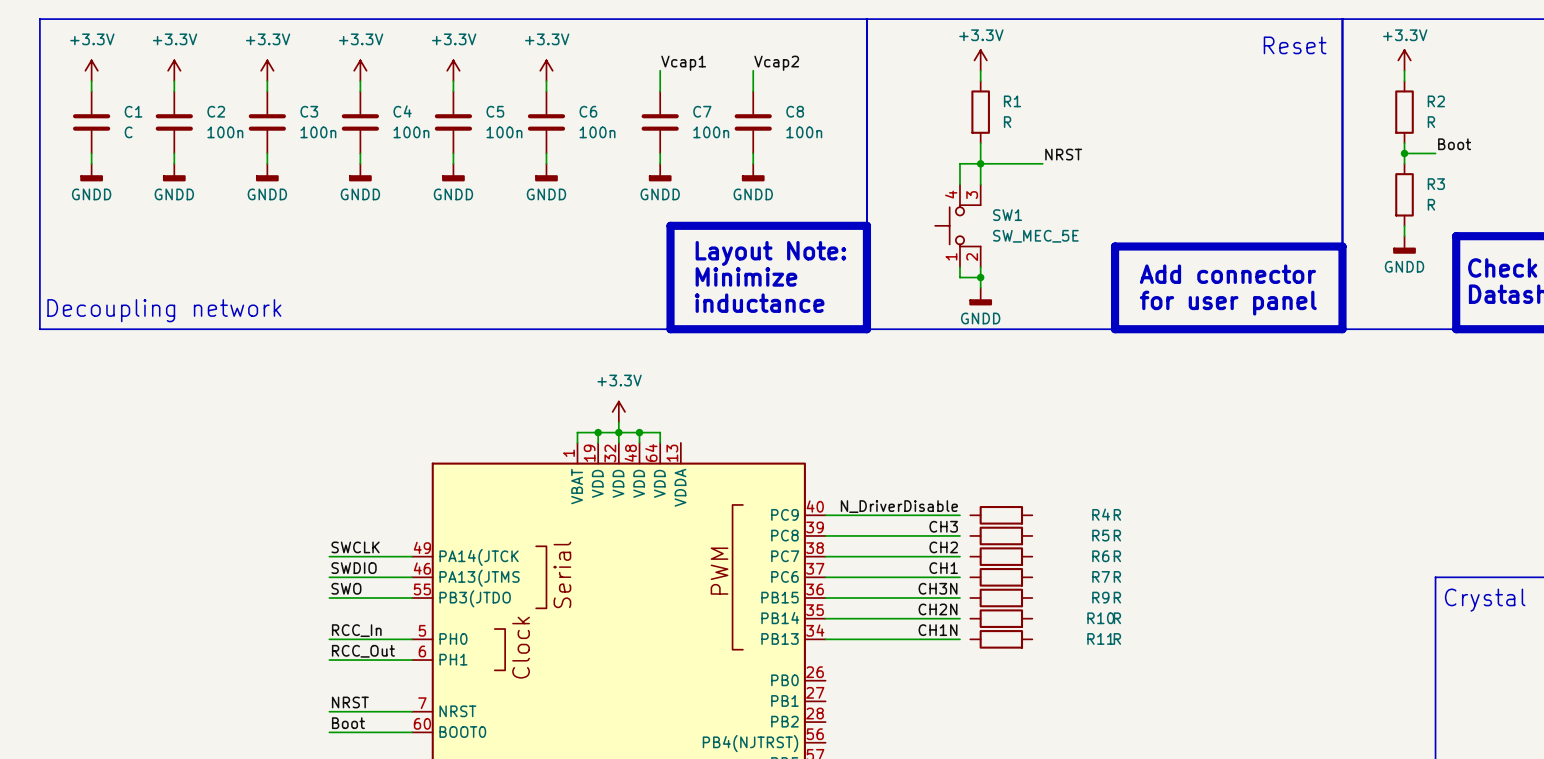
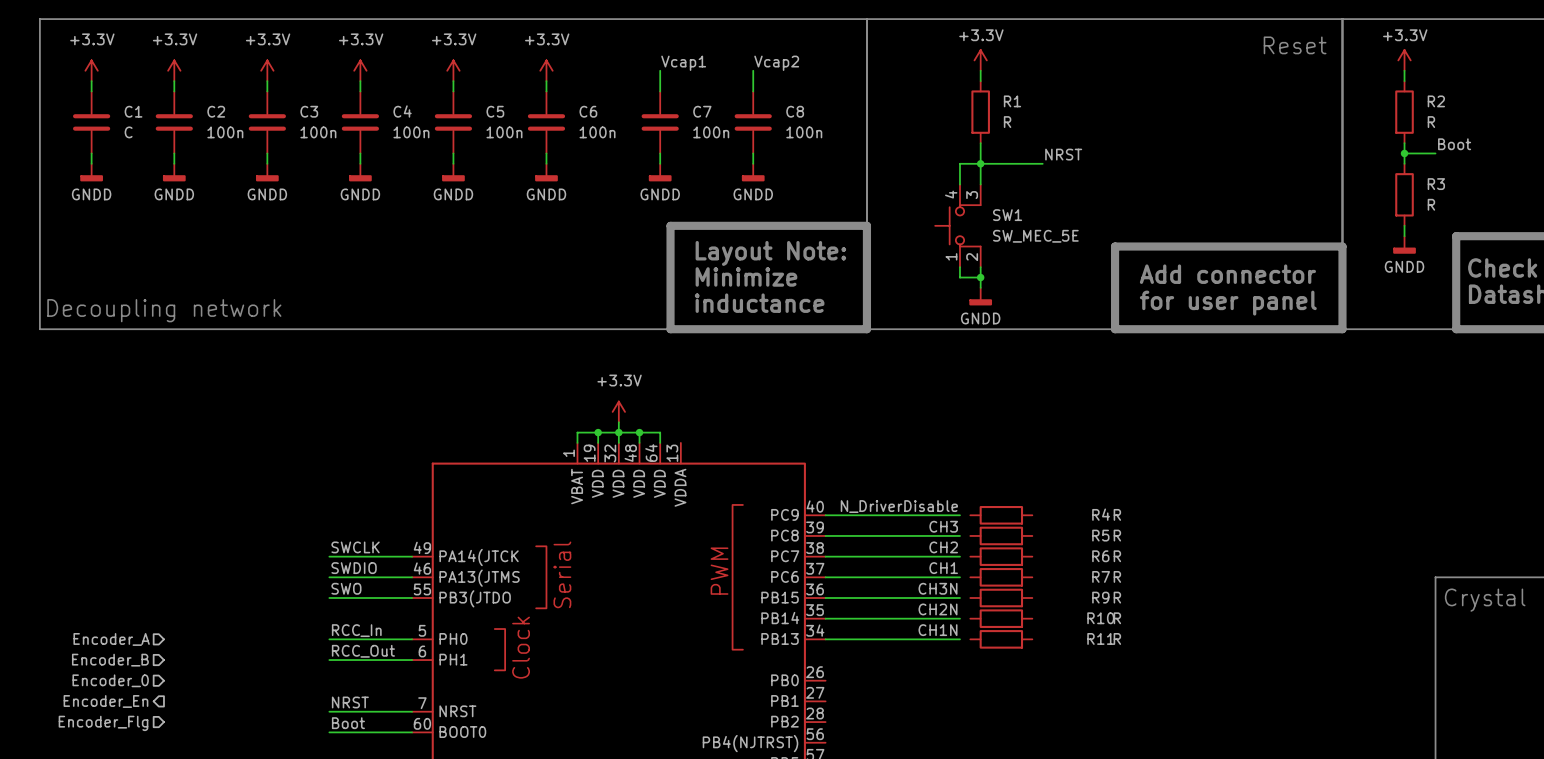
hierarchical label: none -> Encoder_A (111, 639)
hierarchical label: none -> Encoder_B (110, 660)
hierarchical label: none -> Encoder_0 (110, 680)
hierarchical label: none -> Encoder_En (105, 701)
hierarchical label: none -> Encoder_Flg (103, 723)

